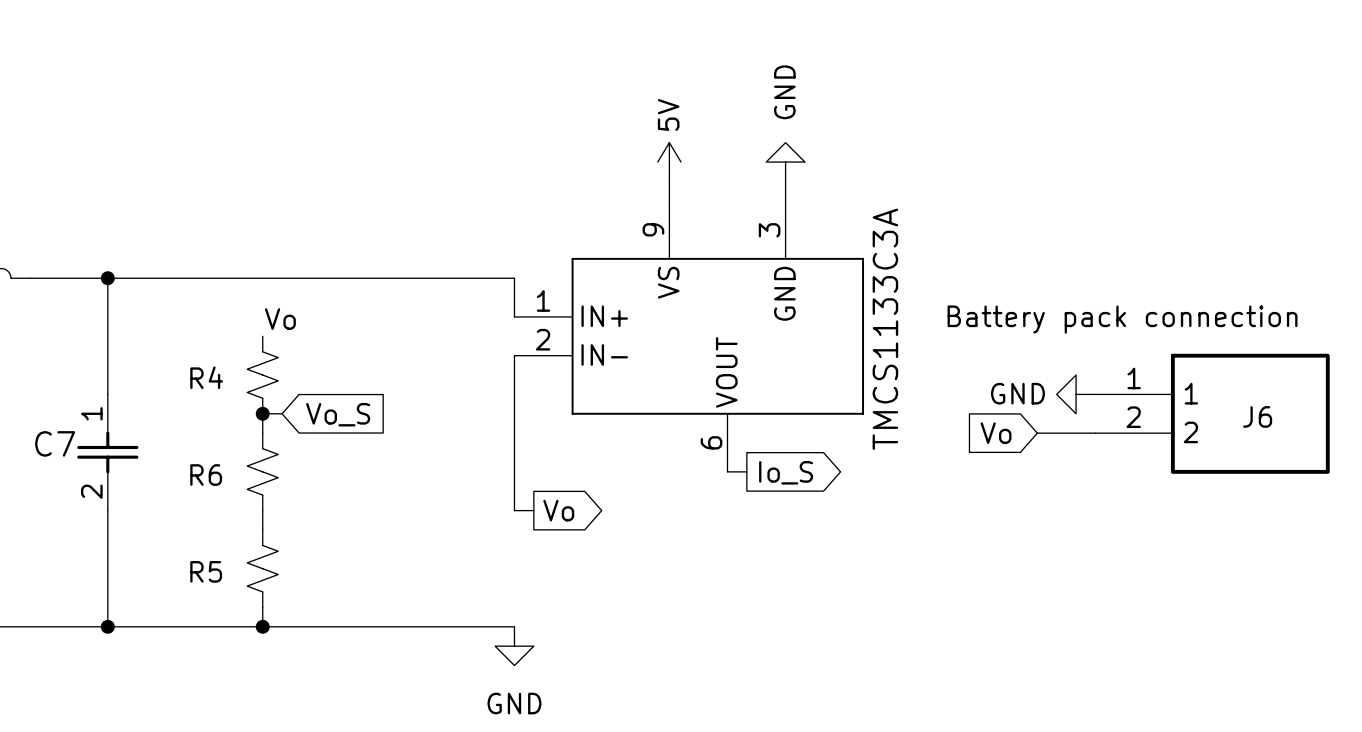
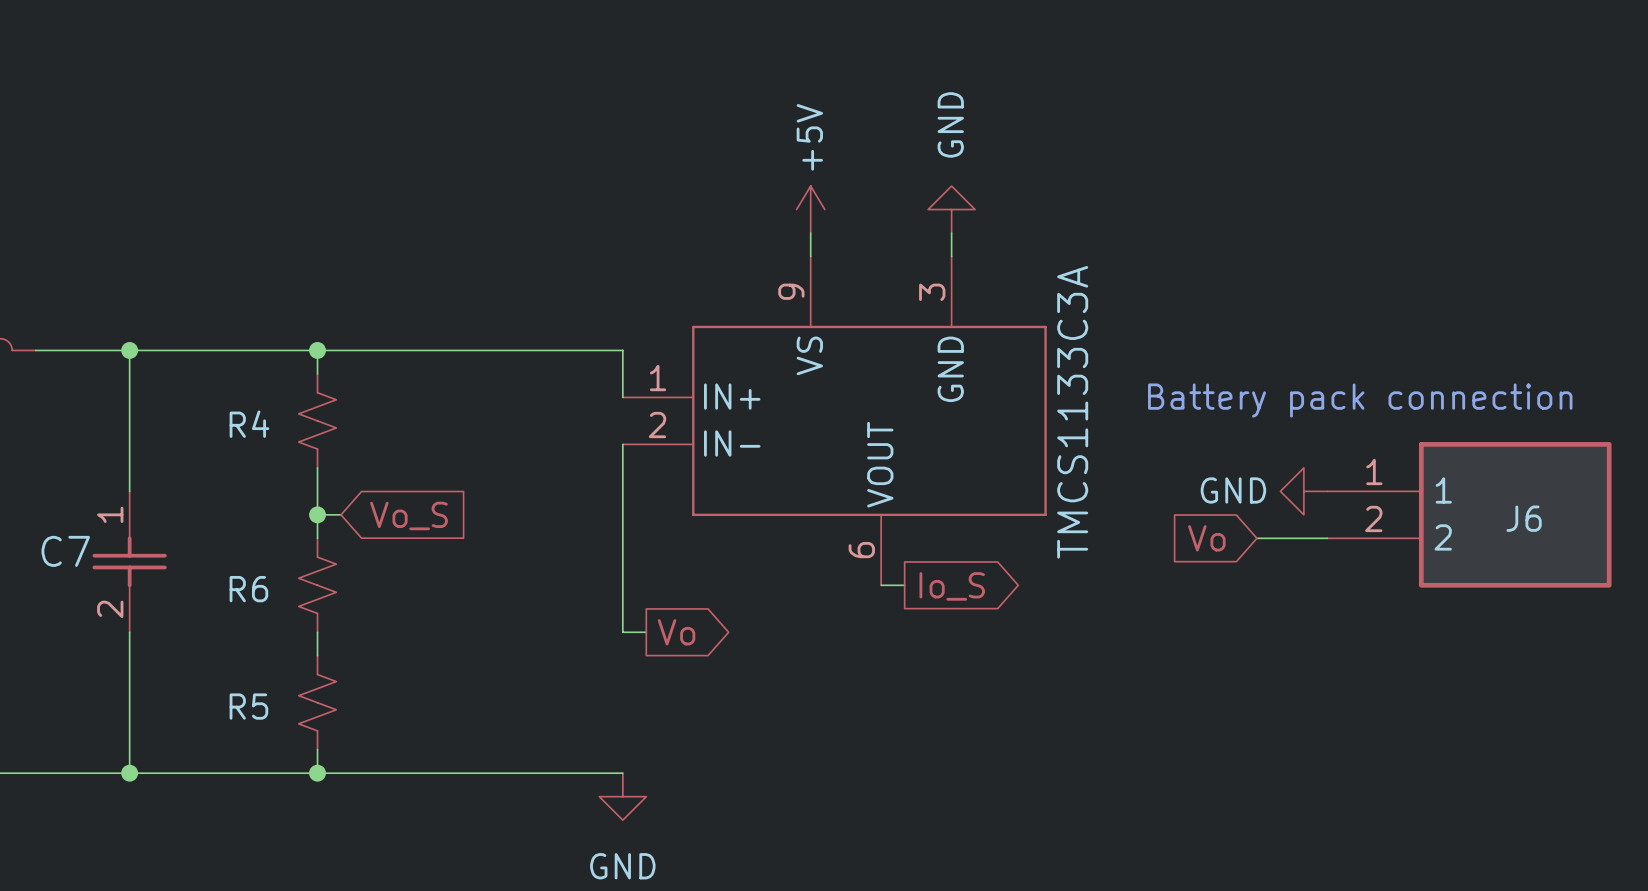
power symbol: 5V (669, 162) -> +5V (810, 209)
wire: none -> (317, 350) (317, 373)
junction: none -> (317, 350)
label: Vo (280, 319) -> none
wire: none -> (317, 467) (317, 514)
R4 position: (262, 375) -> (317, 420)

